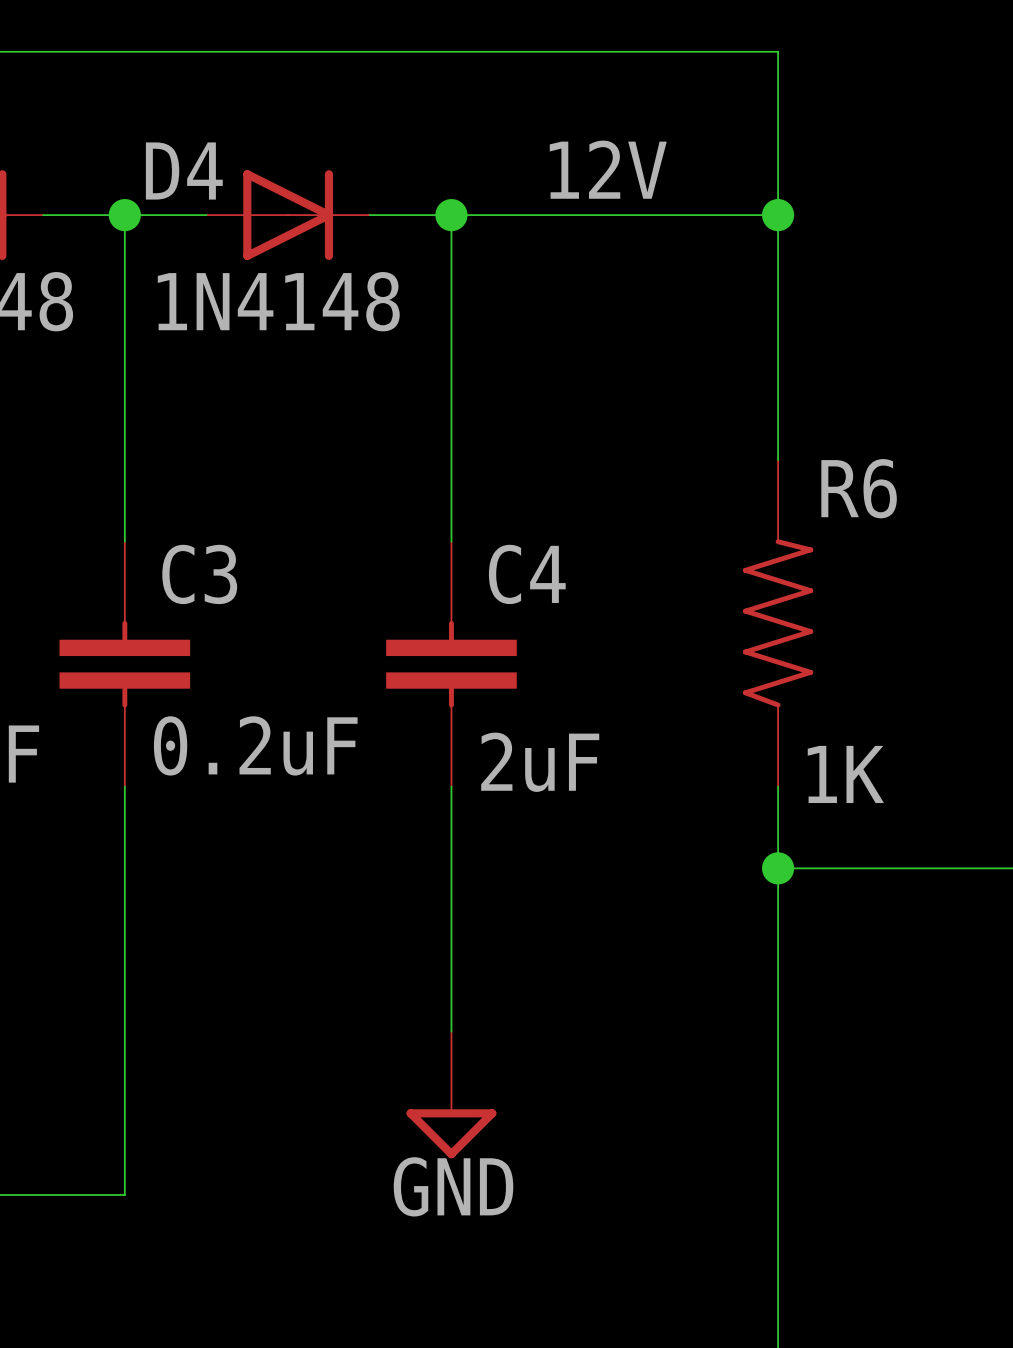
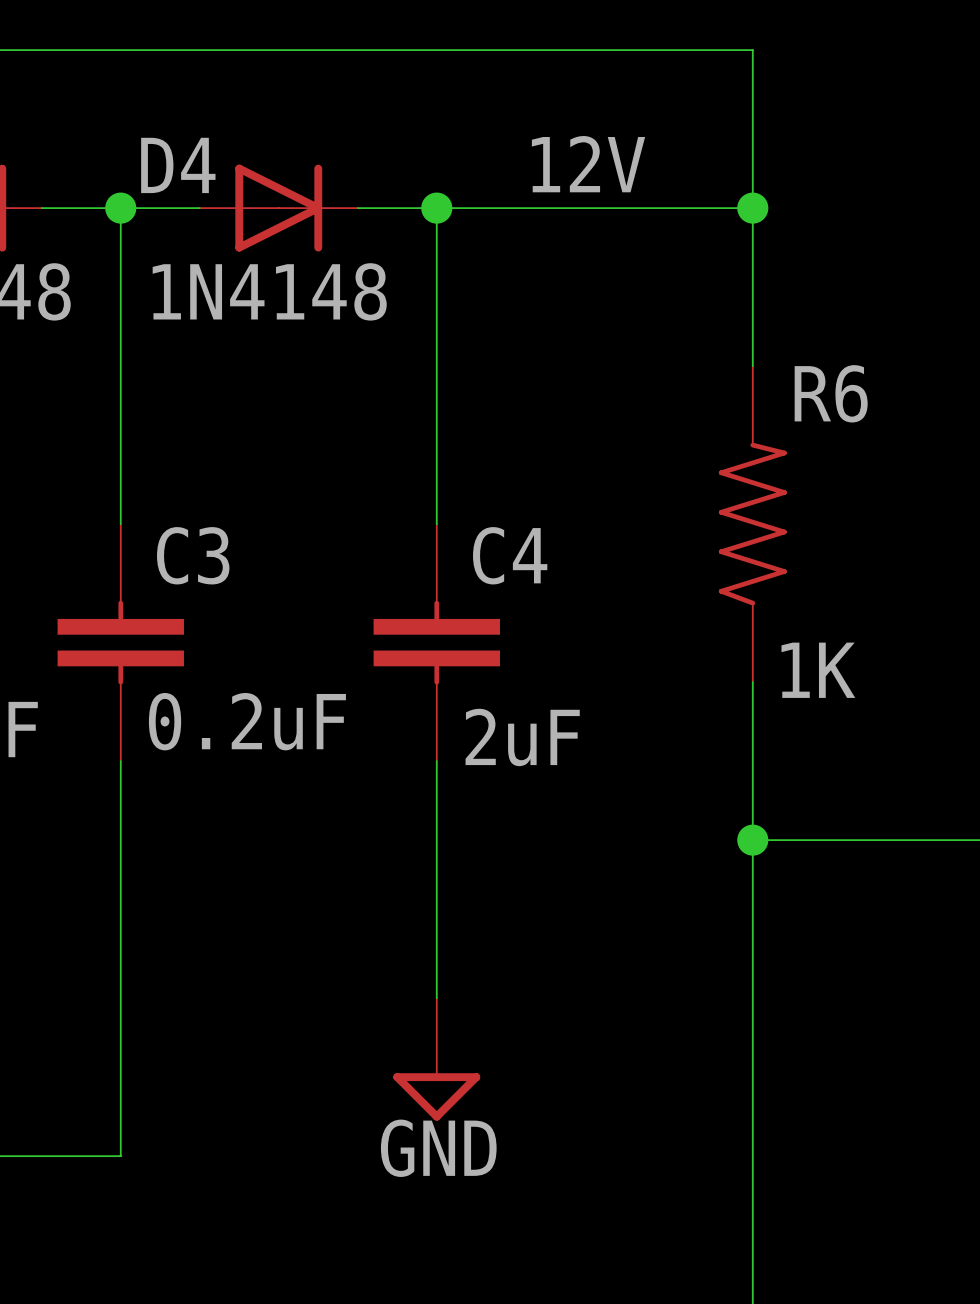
R6 position: (778, 623) -> (752, 524)

